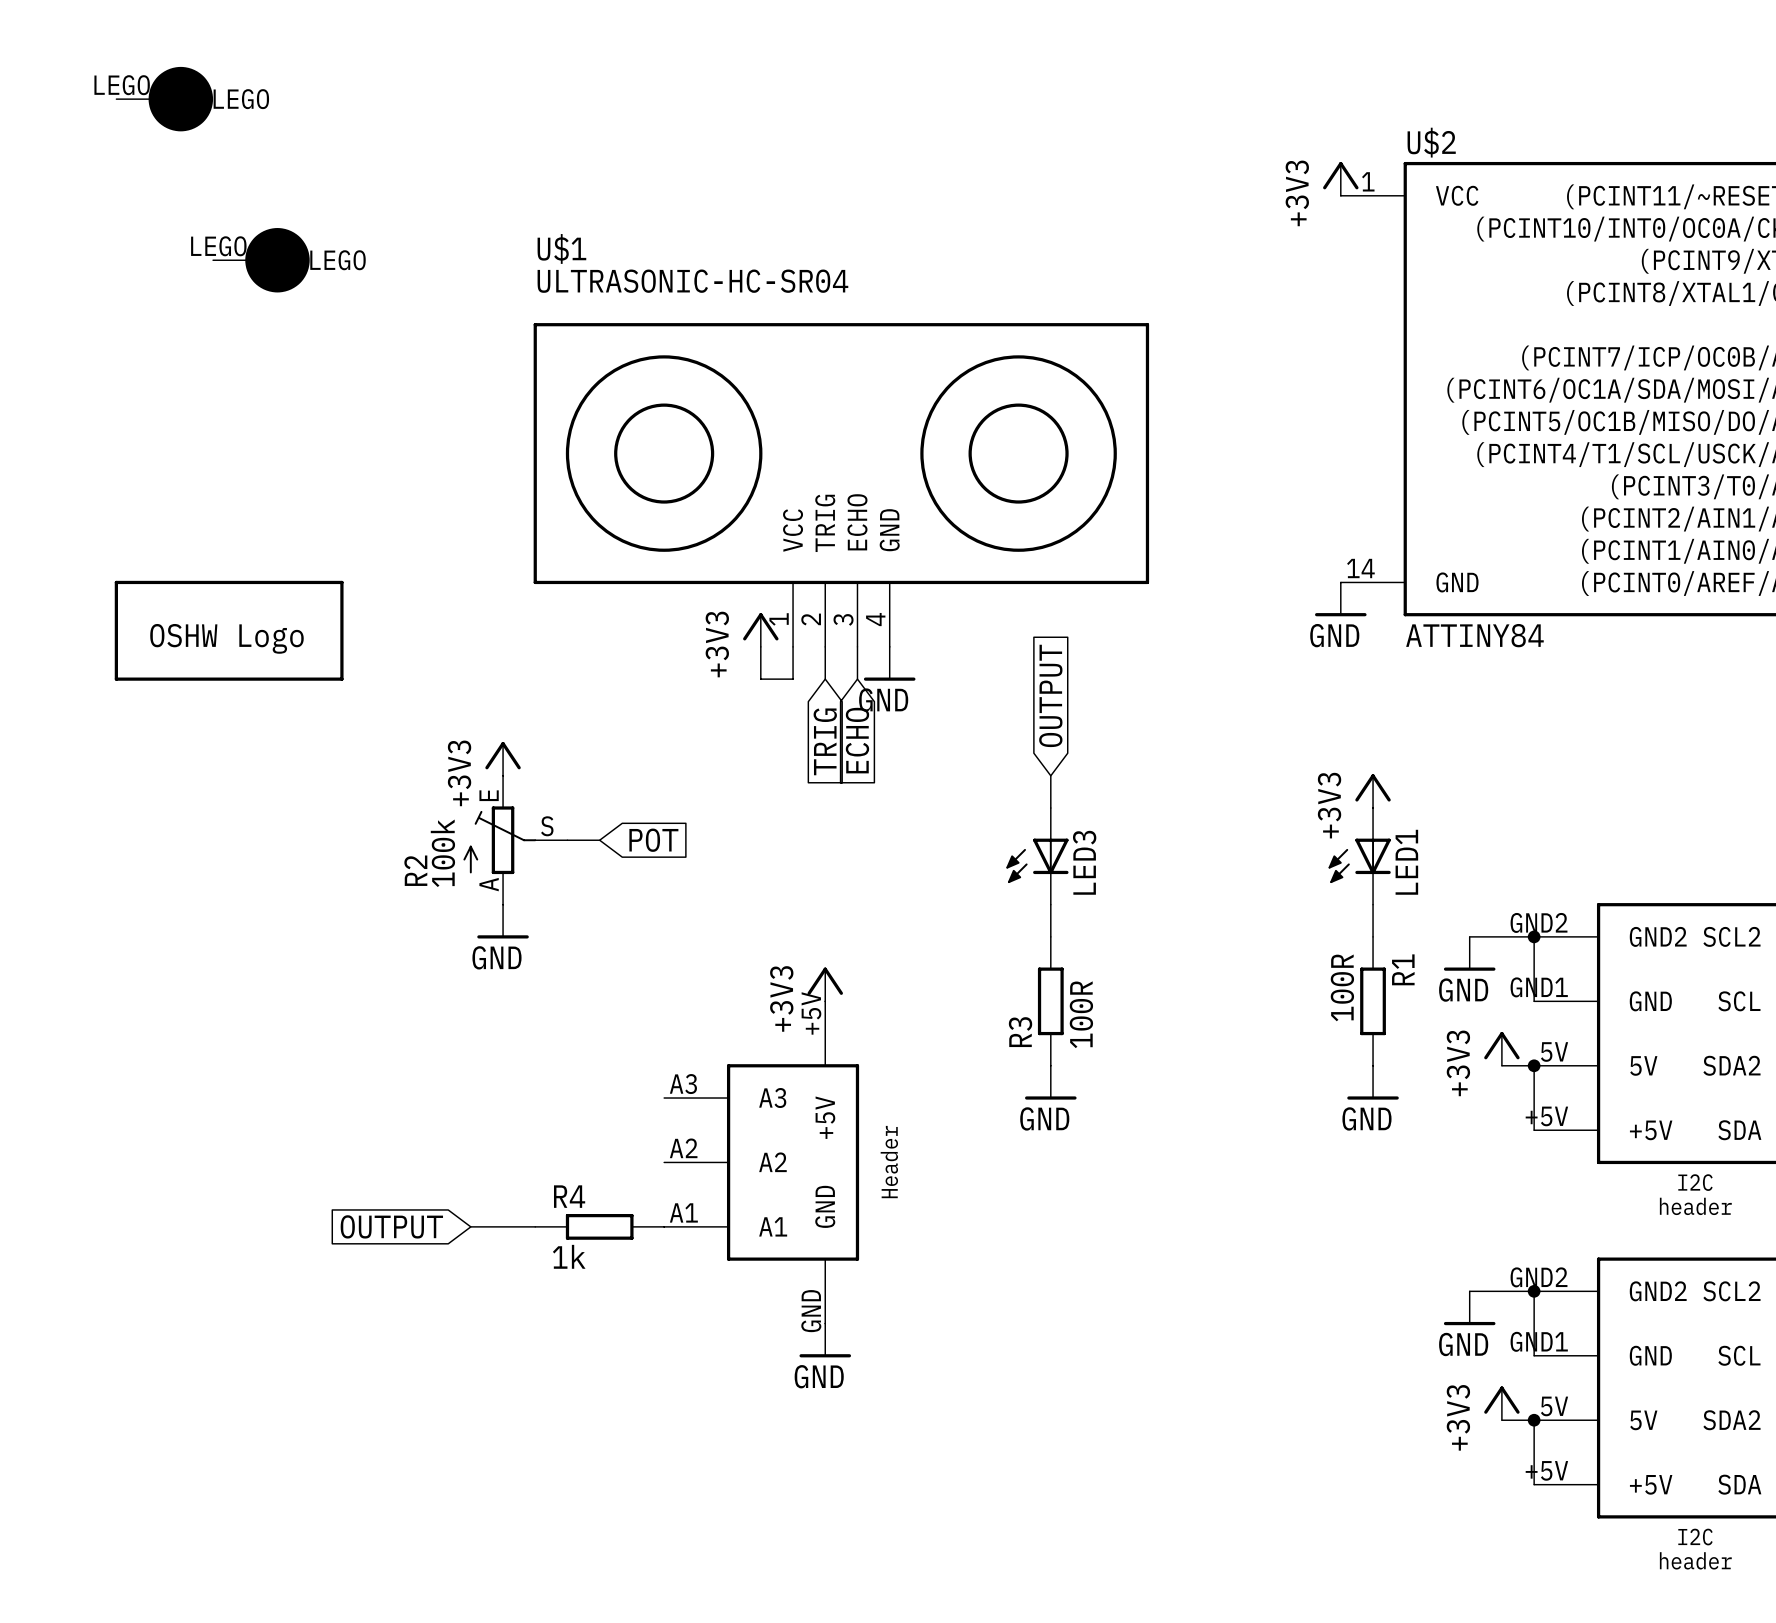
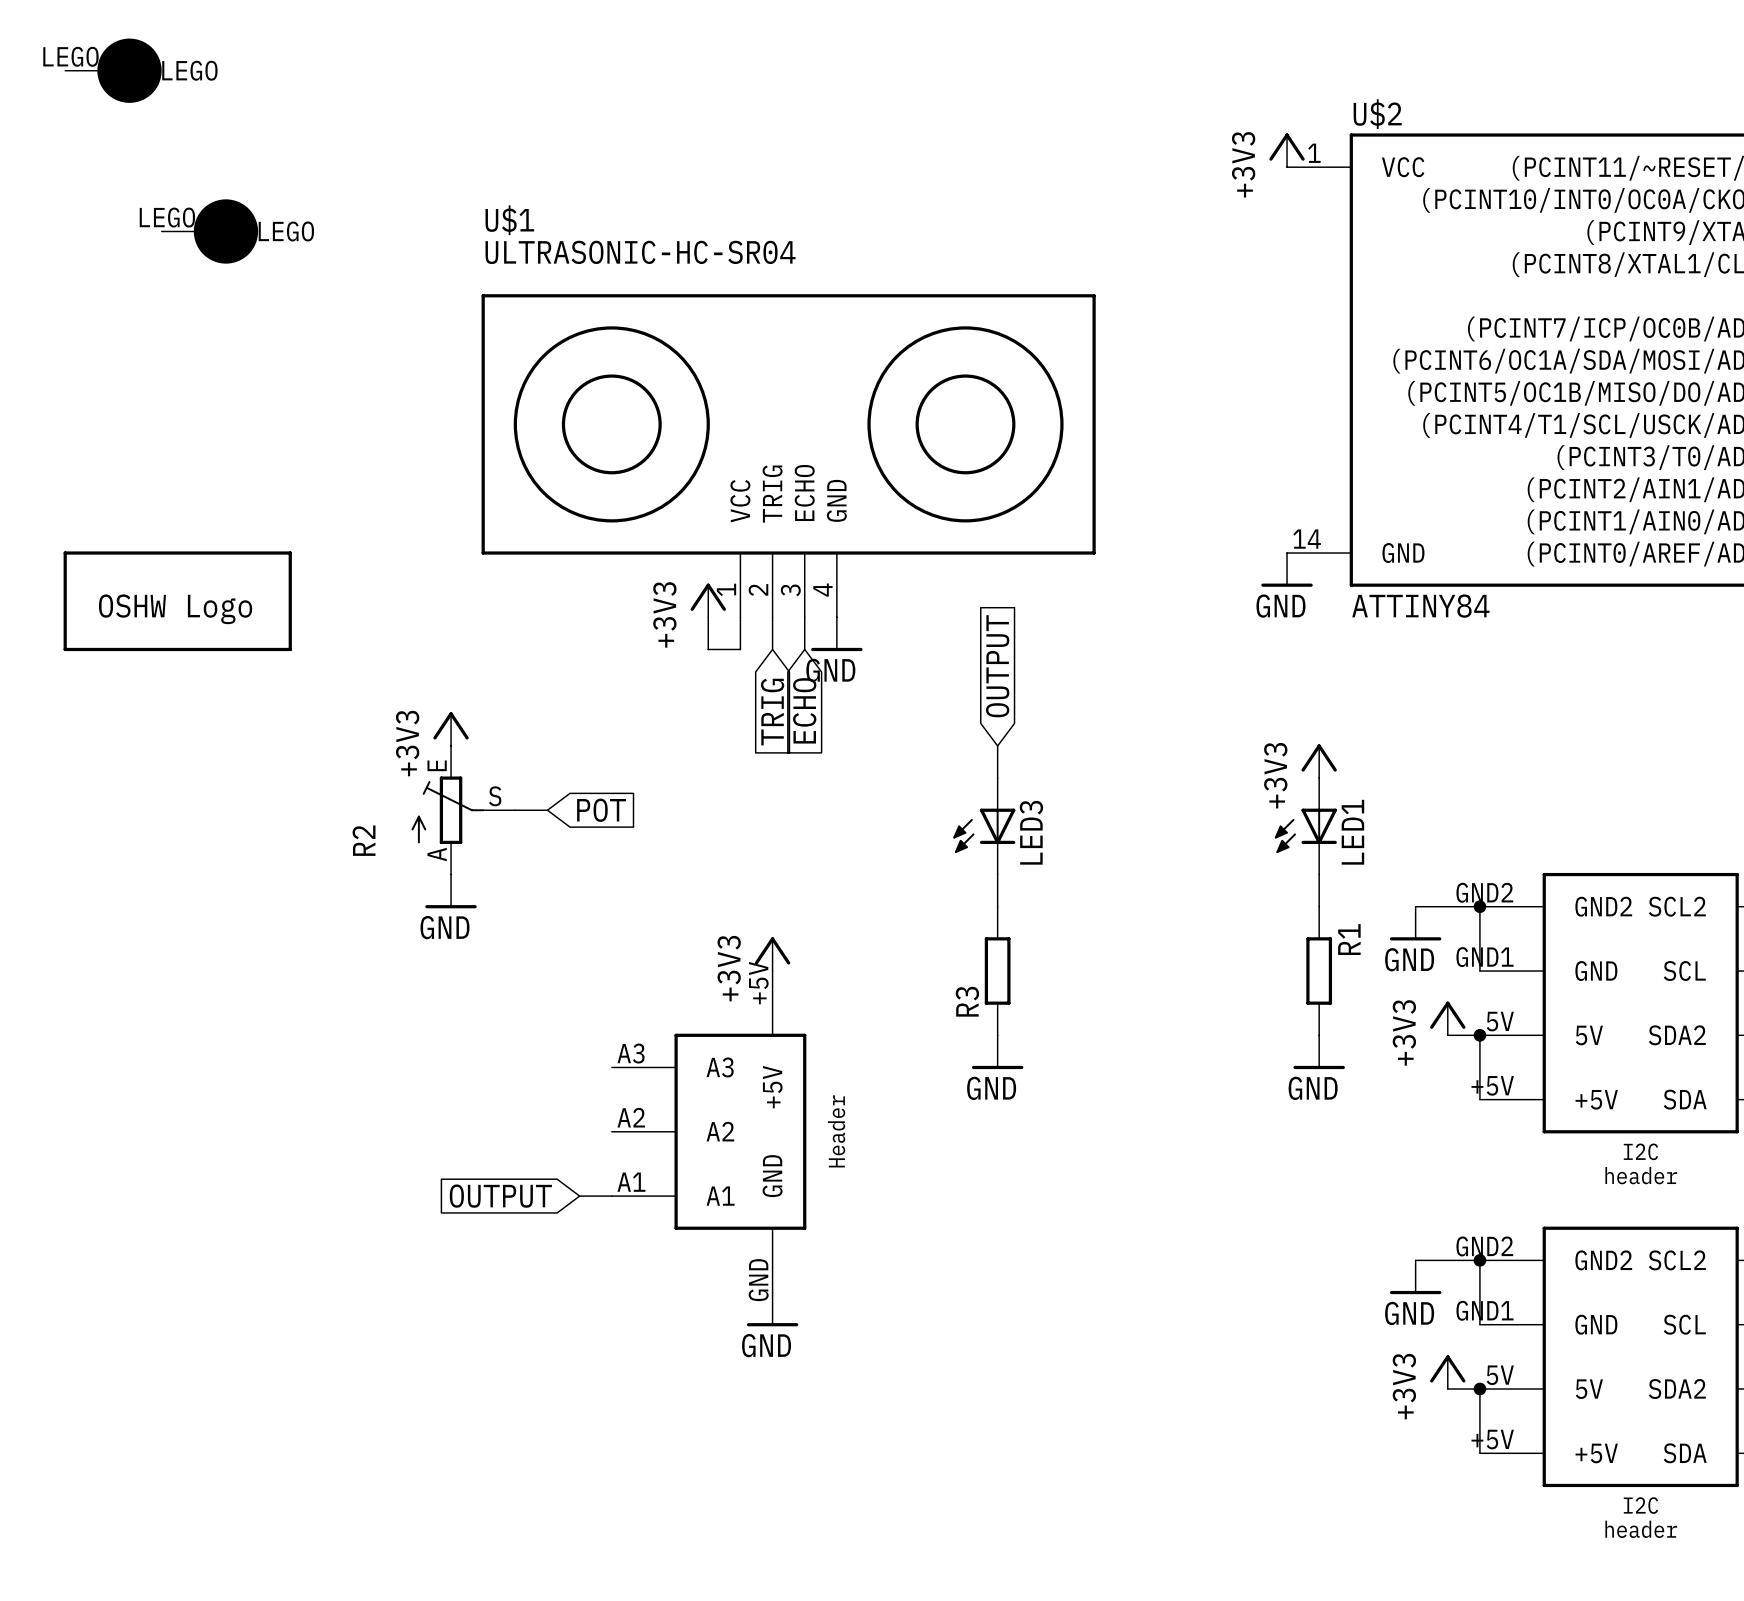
R2 value: 100k (442, 853) -> none
R1 value: 100R (1342, 987) -> none
R3 value: 100R (1081, 1014) -> none
global label position: OUTPUT (391, 1226) -> OUTPUT (500, 1196)
wire: (470, 1226) (535, 1226) -> none
R4: 1k (599, 1226) -> none

